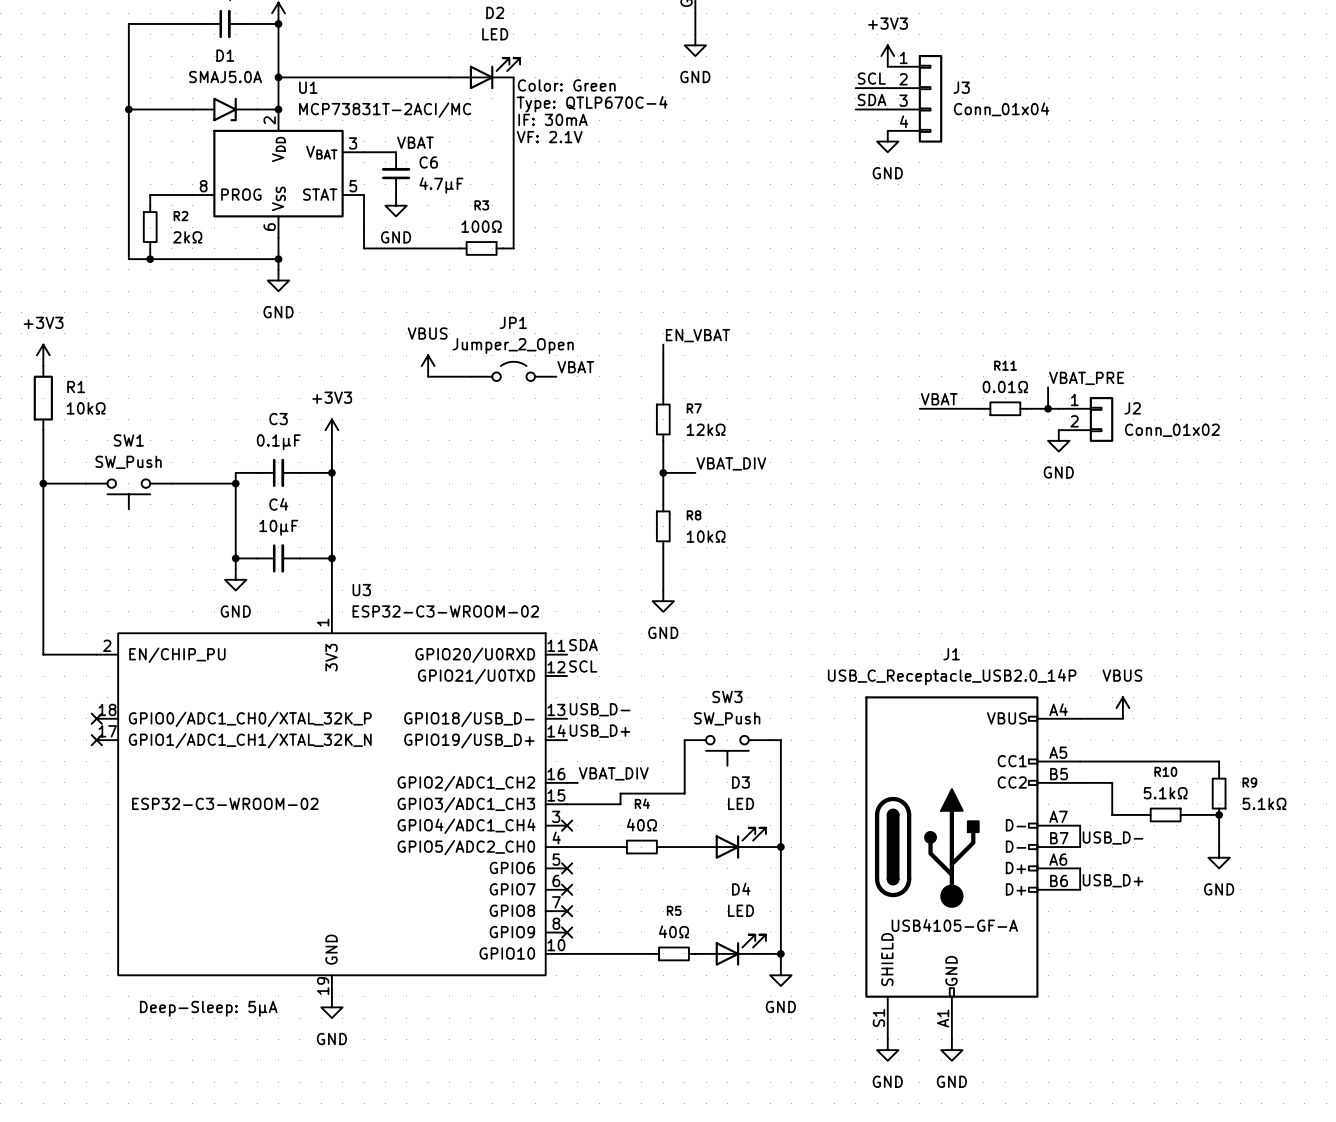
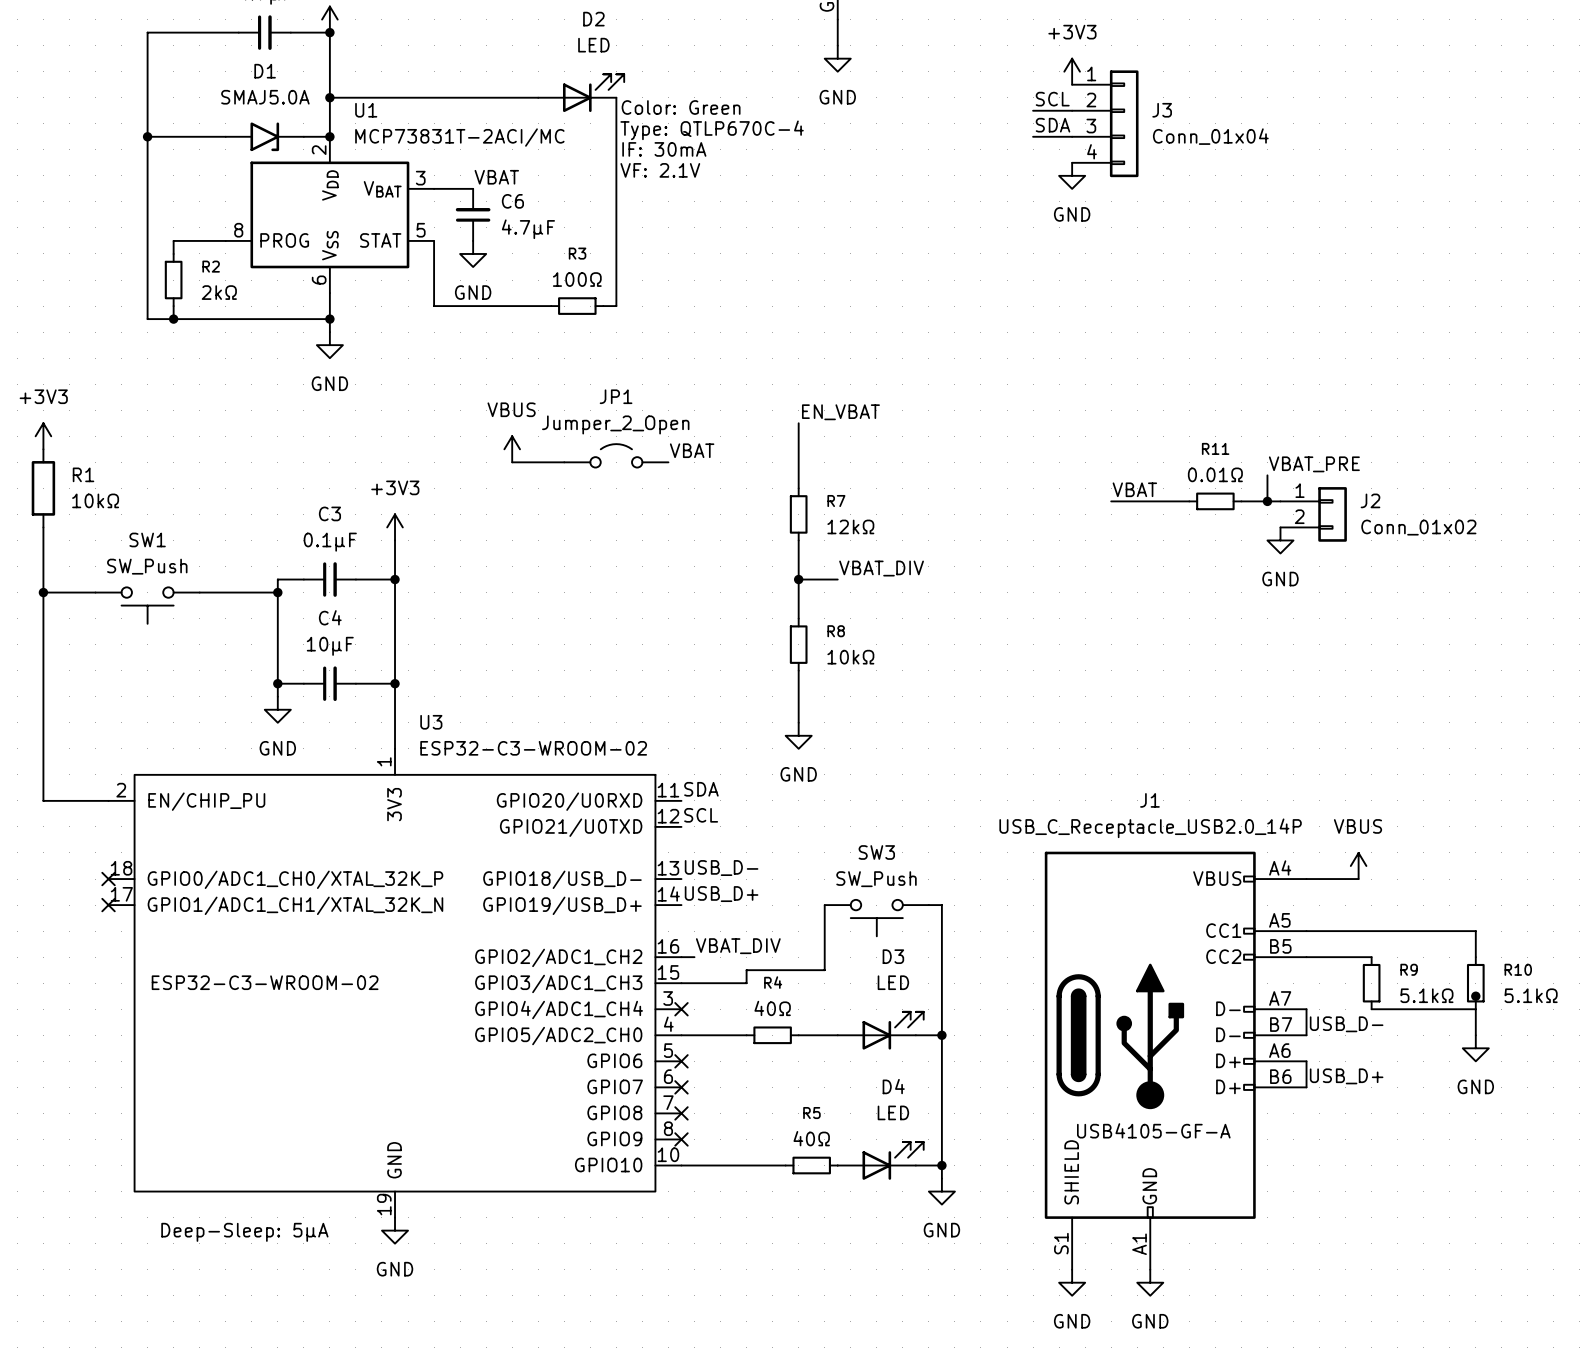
wire: (1112, 782) (1112, 814) (1144, 814) -> (1345, 957) (1371, 957)
R10 value position: 5.1kΩ (1165, 793) -> 5.1kΩ (1531, 995)
R9 position: (1219, 793) -> (1371, 983)
R10 rotation: 0° (1165, 814) -> 90° clockwise (1475, 983)
R10 position: (1165, 814) -> (1475, 983)
wire: (1187, 814) (1219, 814) (1219, 825) -> (1371, 1009) (1475, 1009)

